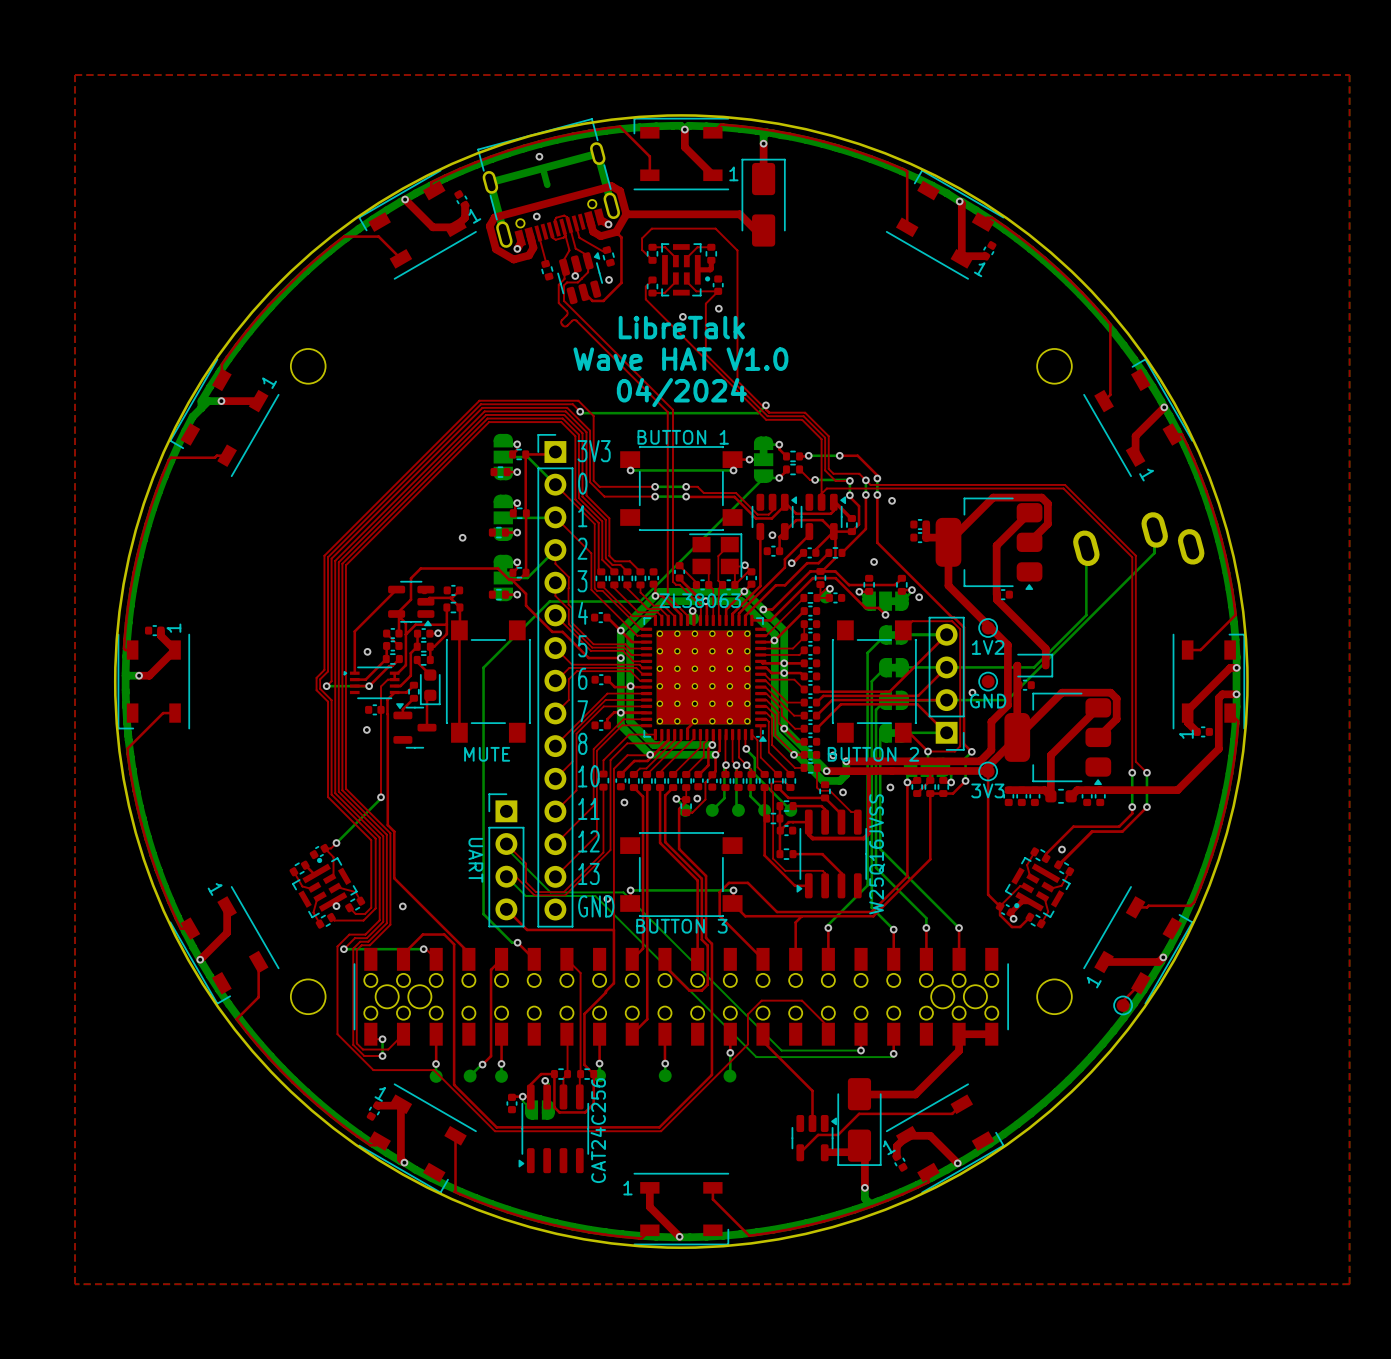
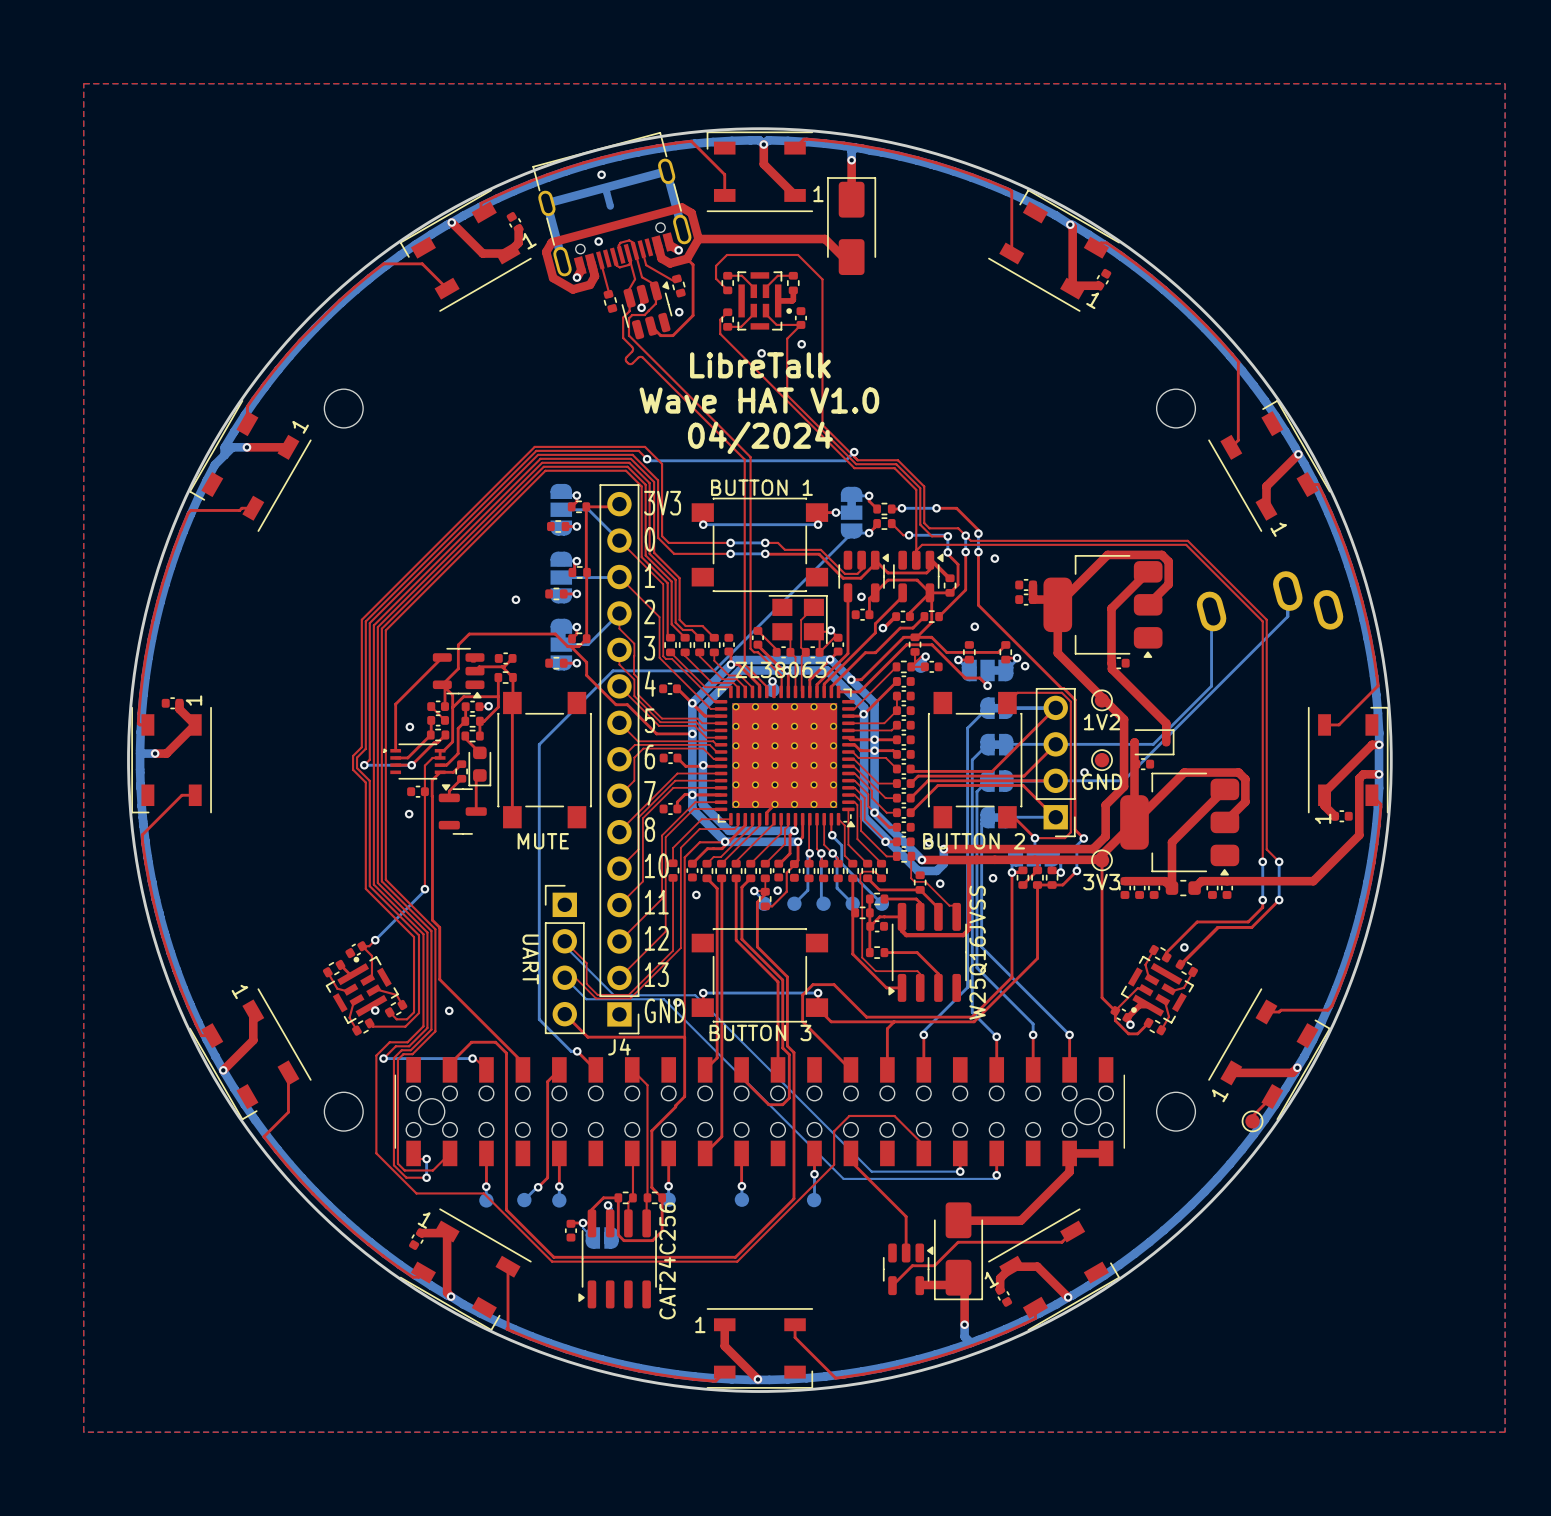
part: (555, 680) -> none
J4: none -> (619, 759)
part footprint: [353, 947, 1009, 1046] -> [394, 1057, 1126, 1167]

